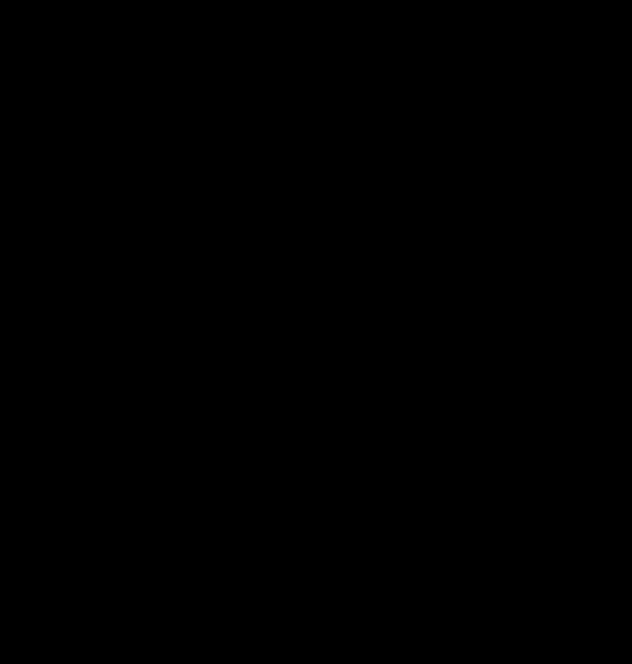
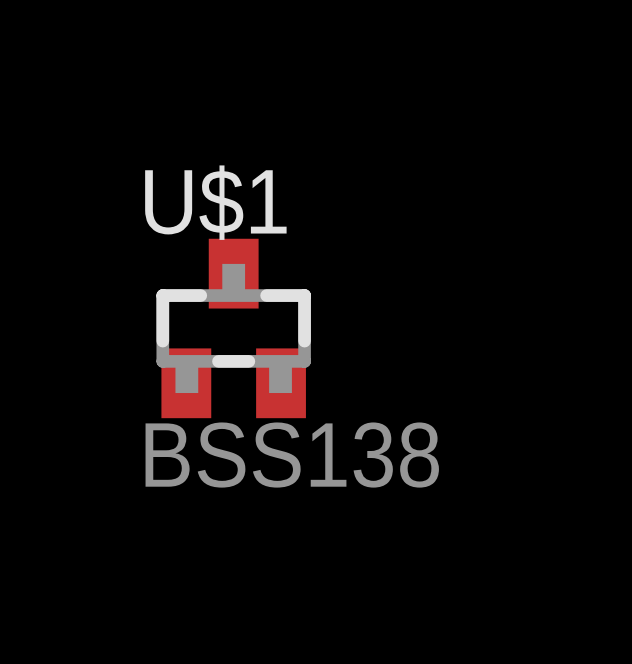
U$1: none -> BSS138 (233, 328)

